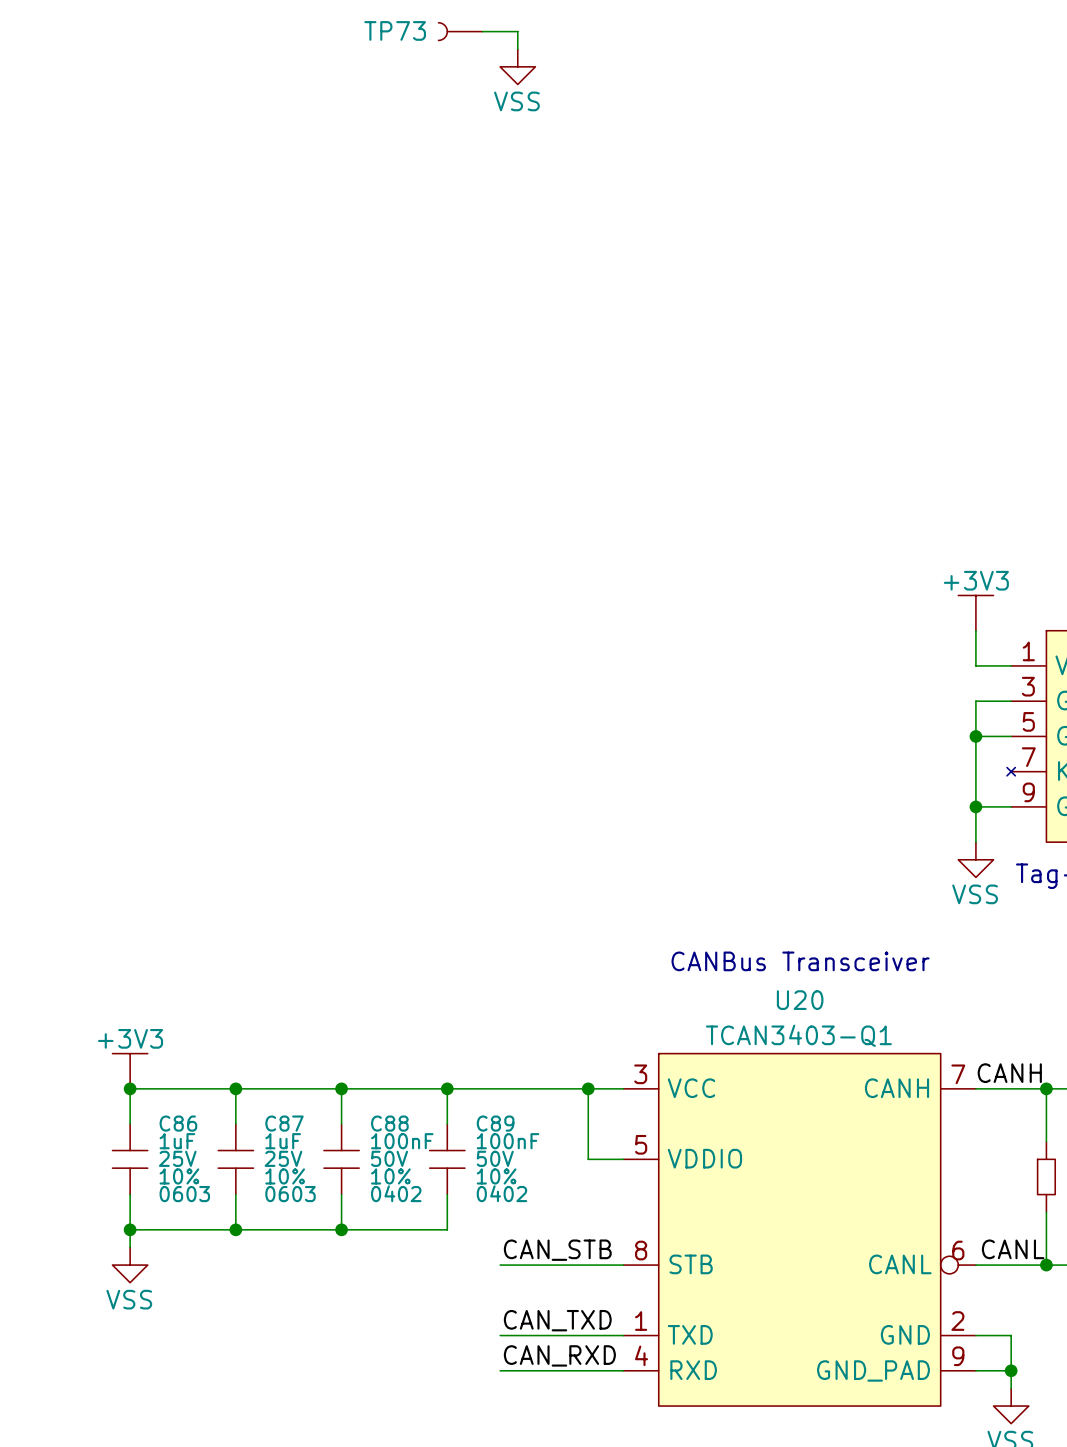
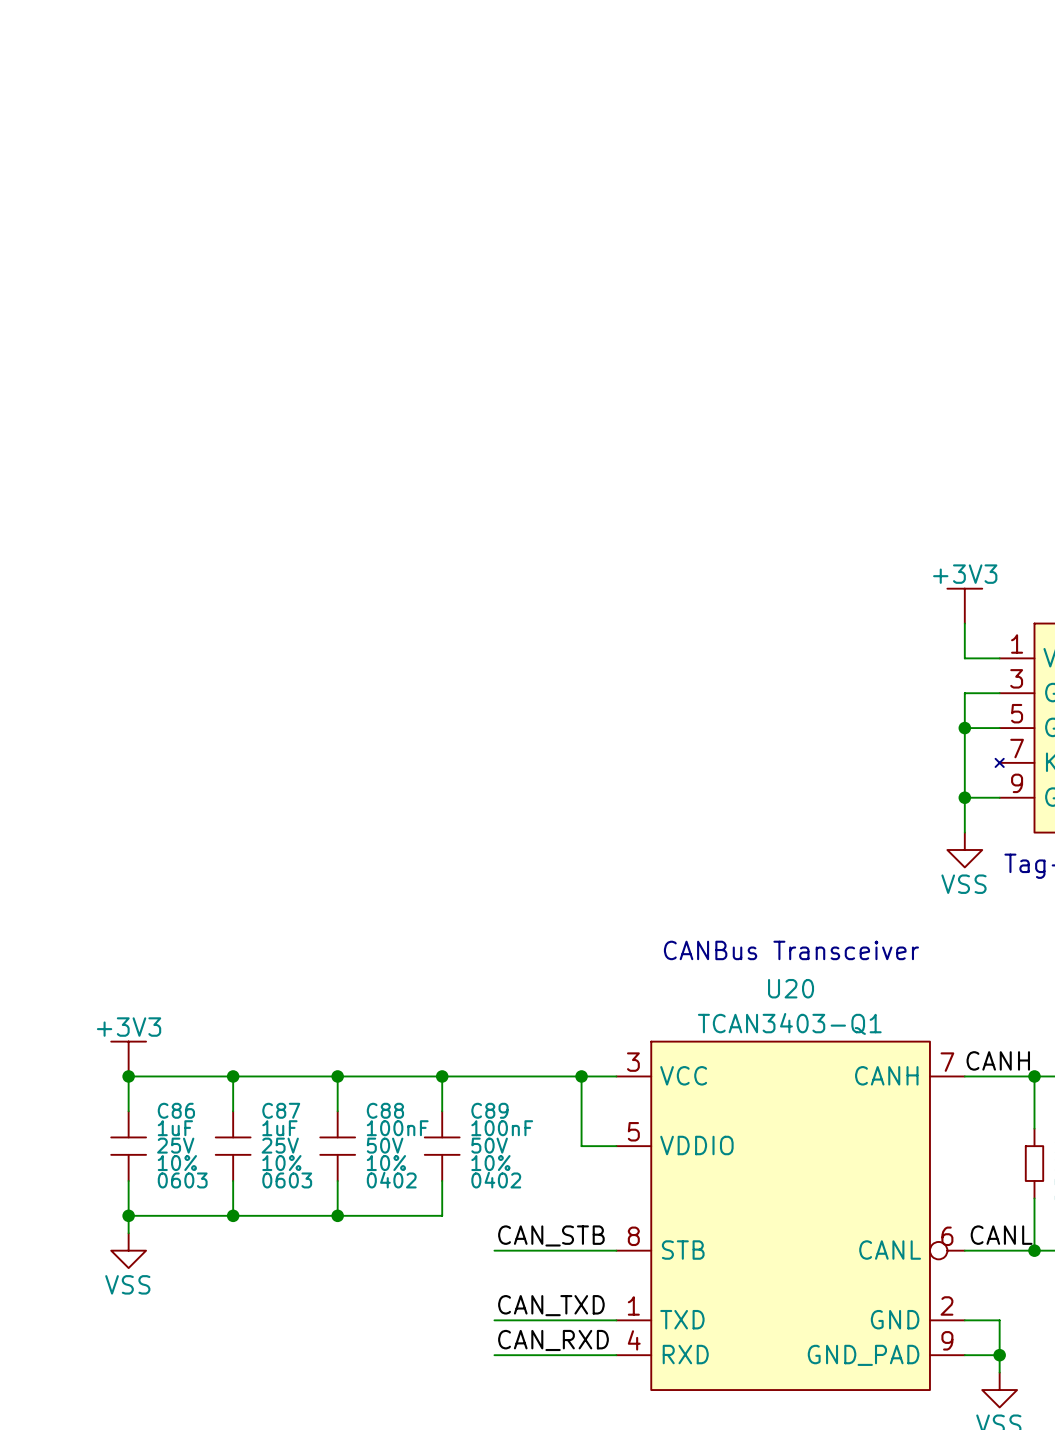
TP73: (460, 31) -> none
wire: (482, 31) (517, 31) (517, 49) -> none
power symbol: VSS (517, 66) -> none

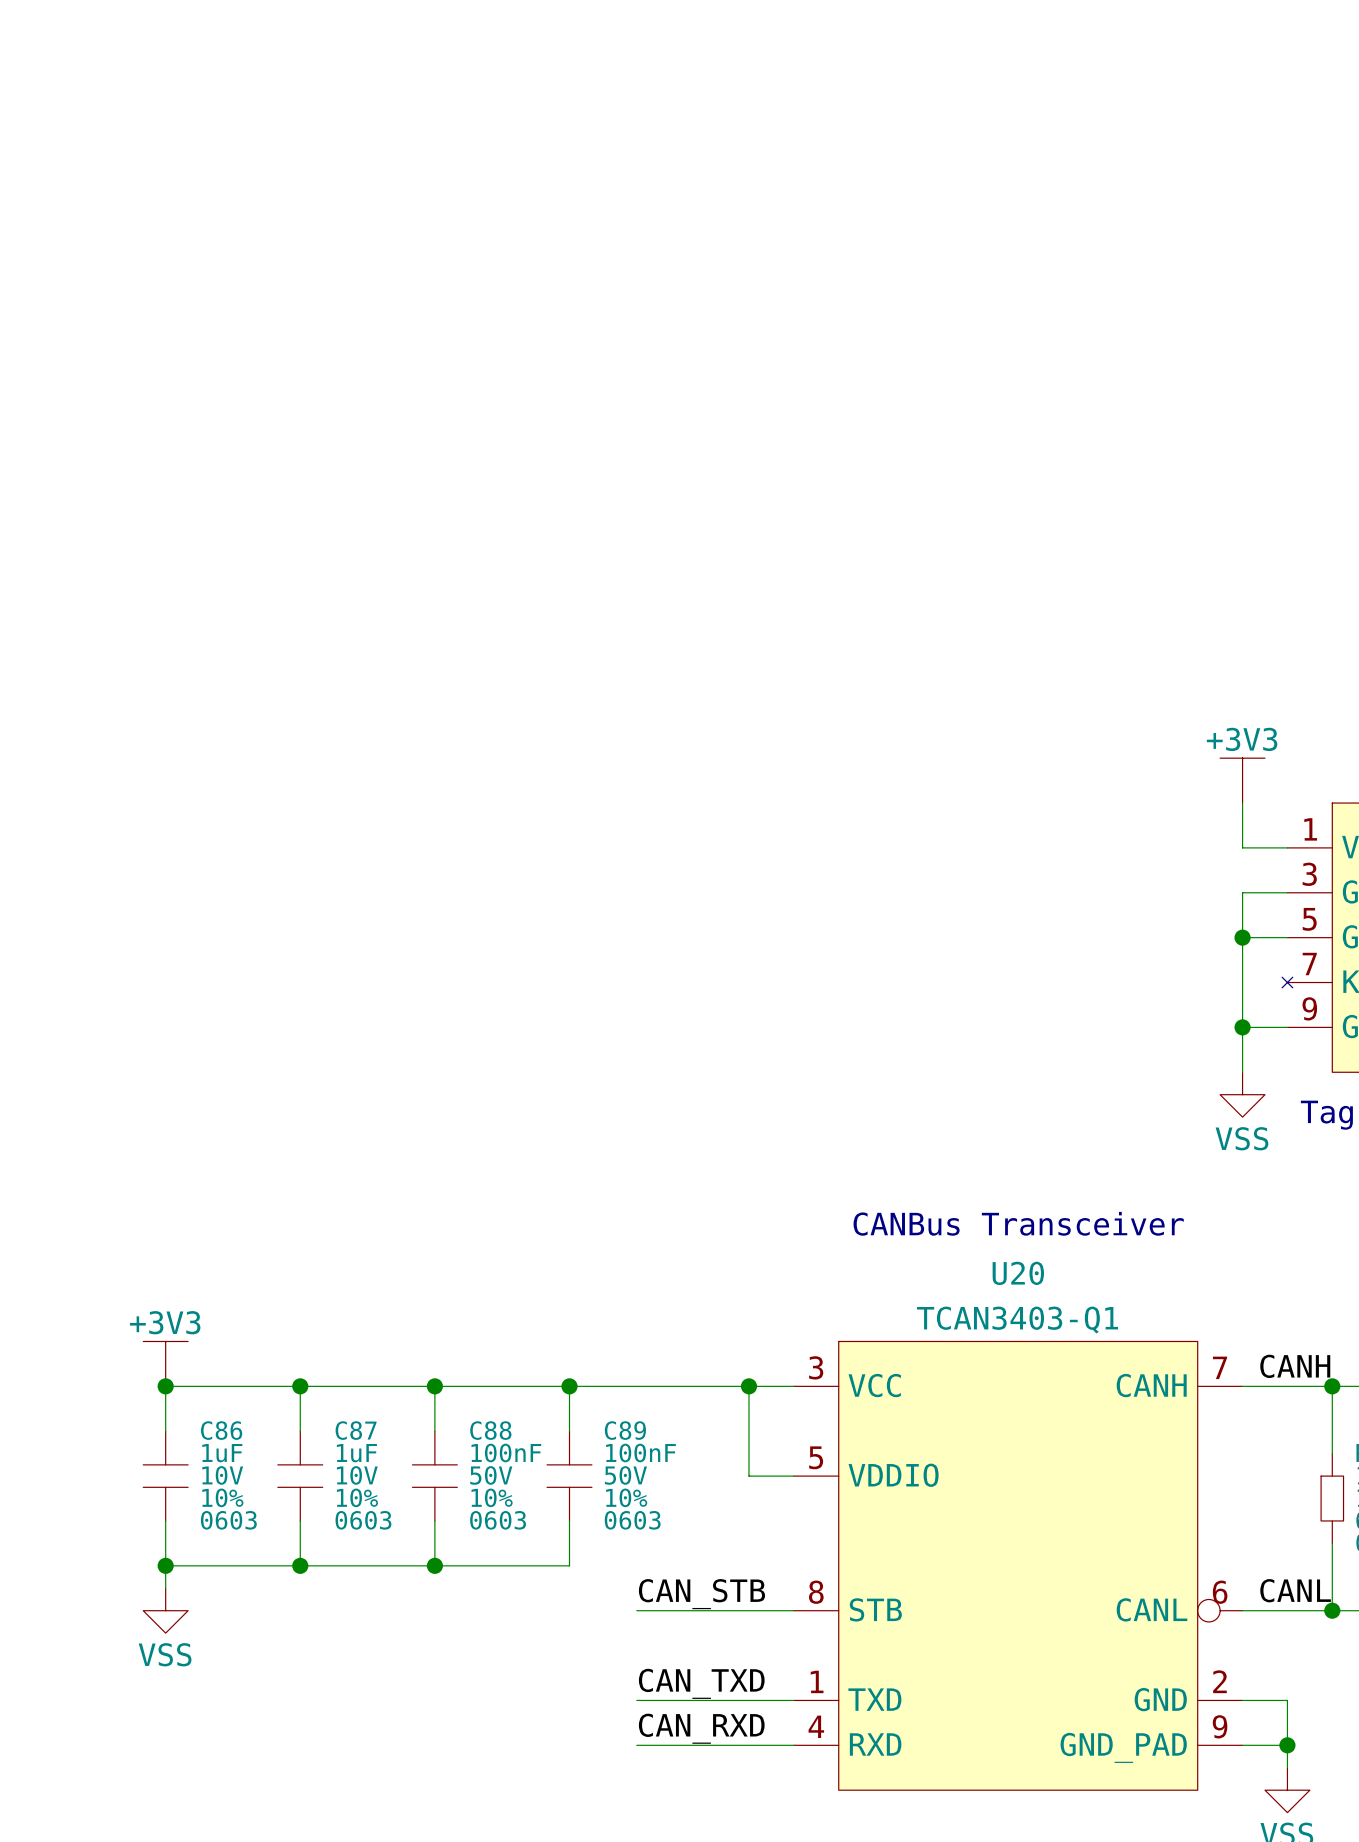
C86 text: 25V (175, 1145) -> 10V (222, 1475)
C87 text: 25V (280, 1145) -> 10V (357, 1475)
C88 text: 0402 (391, 1180) -> 0603 (498, 1520)
C89 text: 0402 (496, 1180) -> 0603 (632, 1520)

